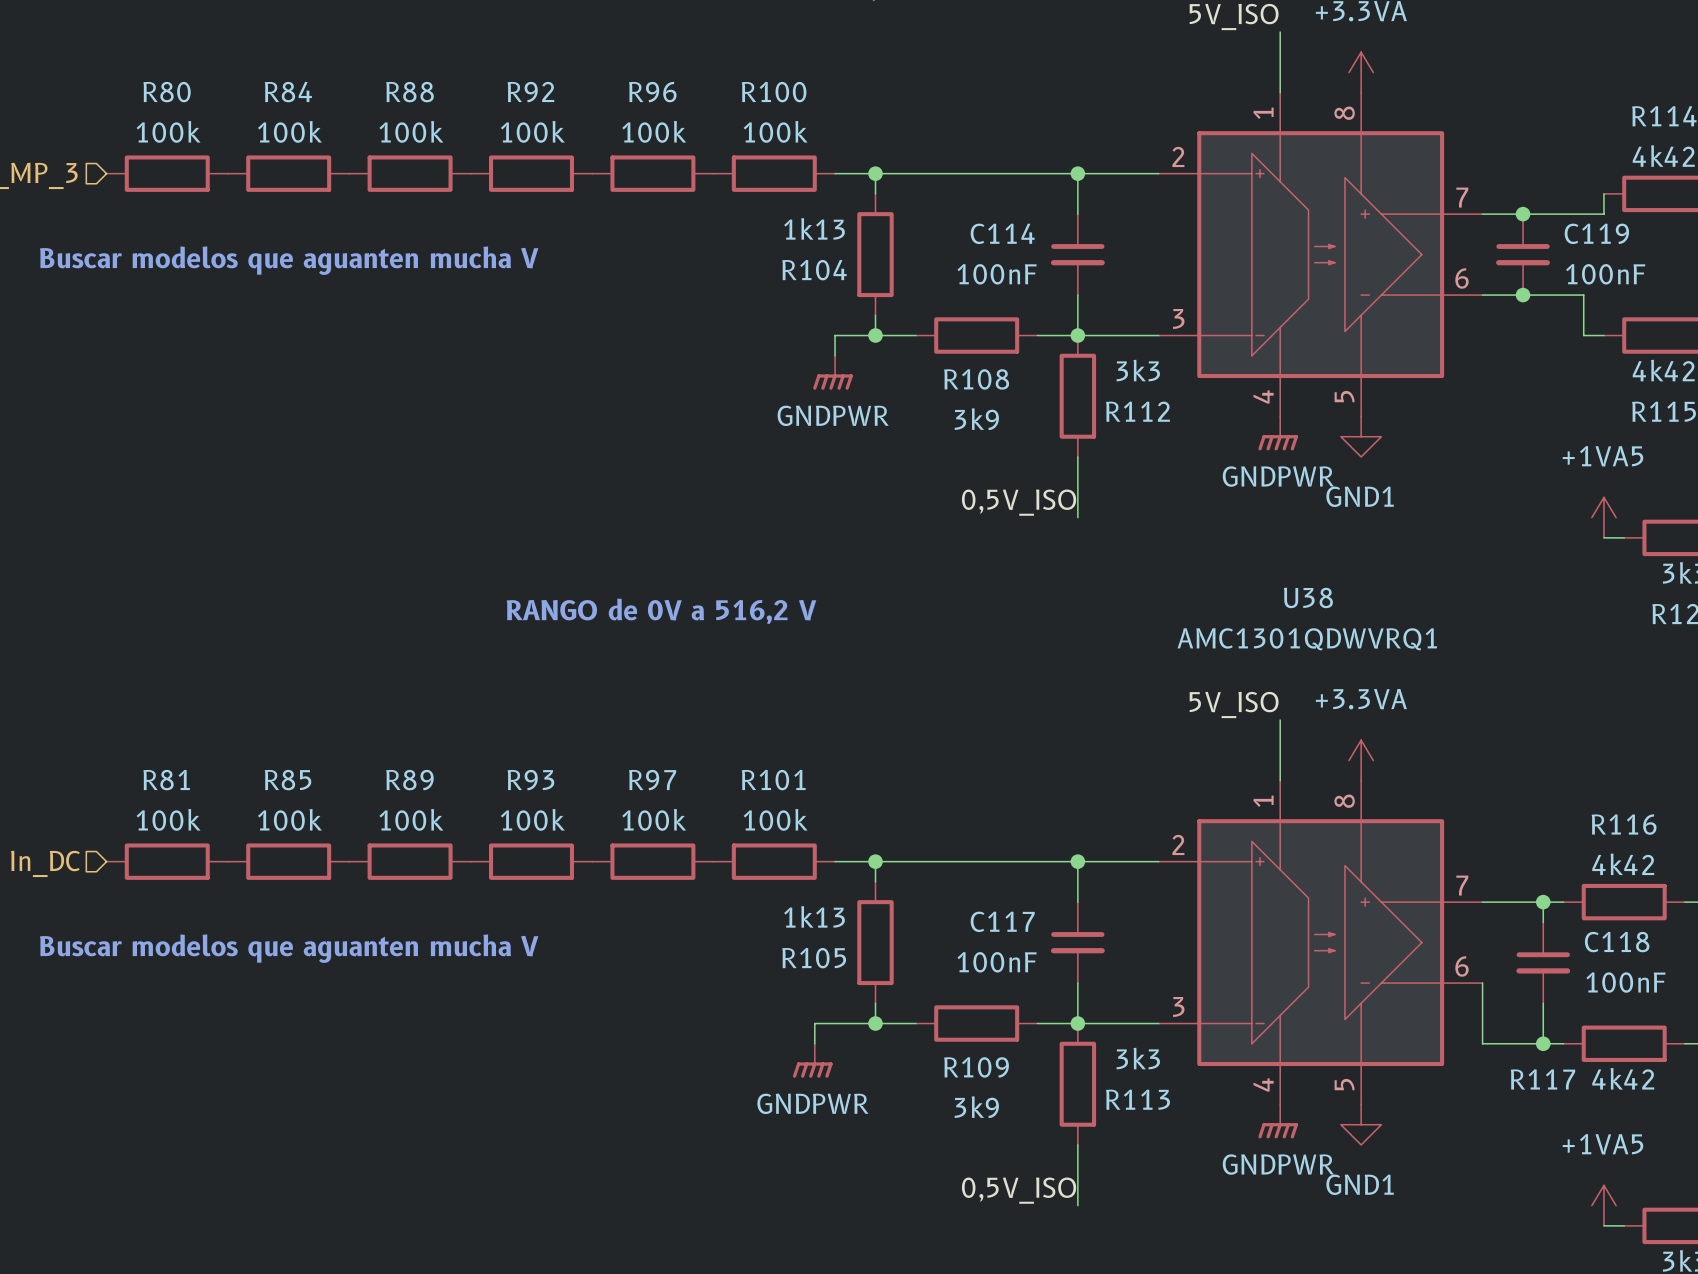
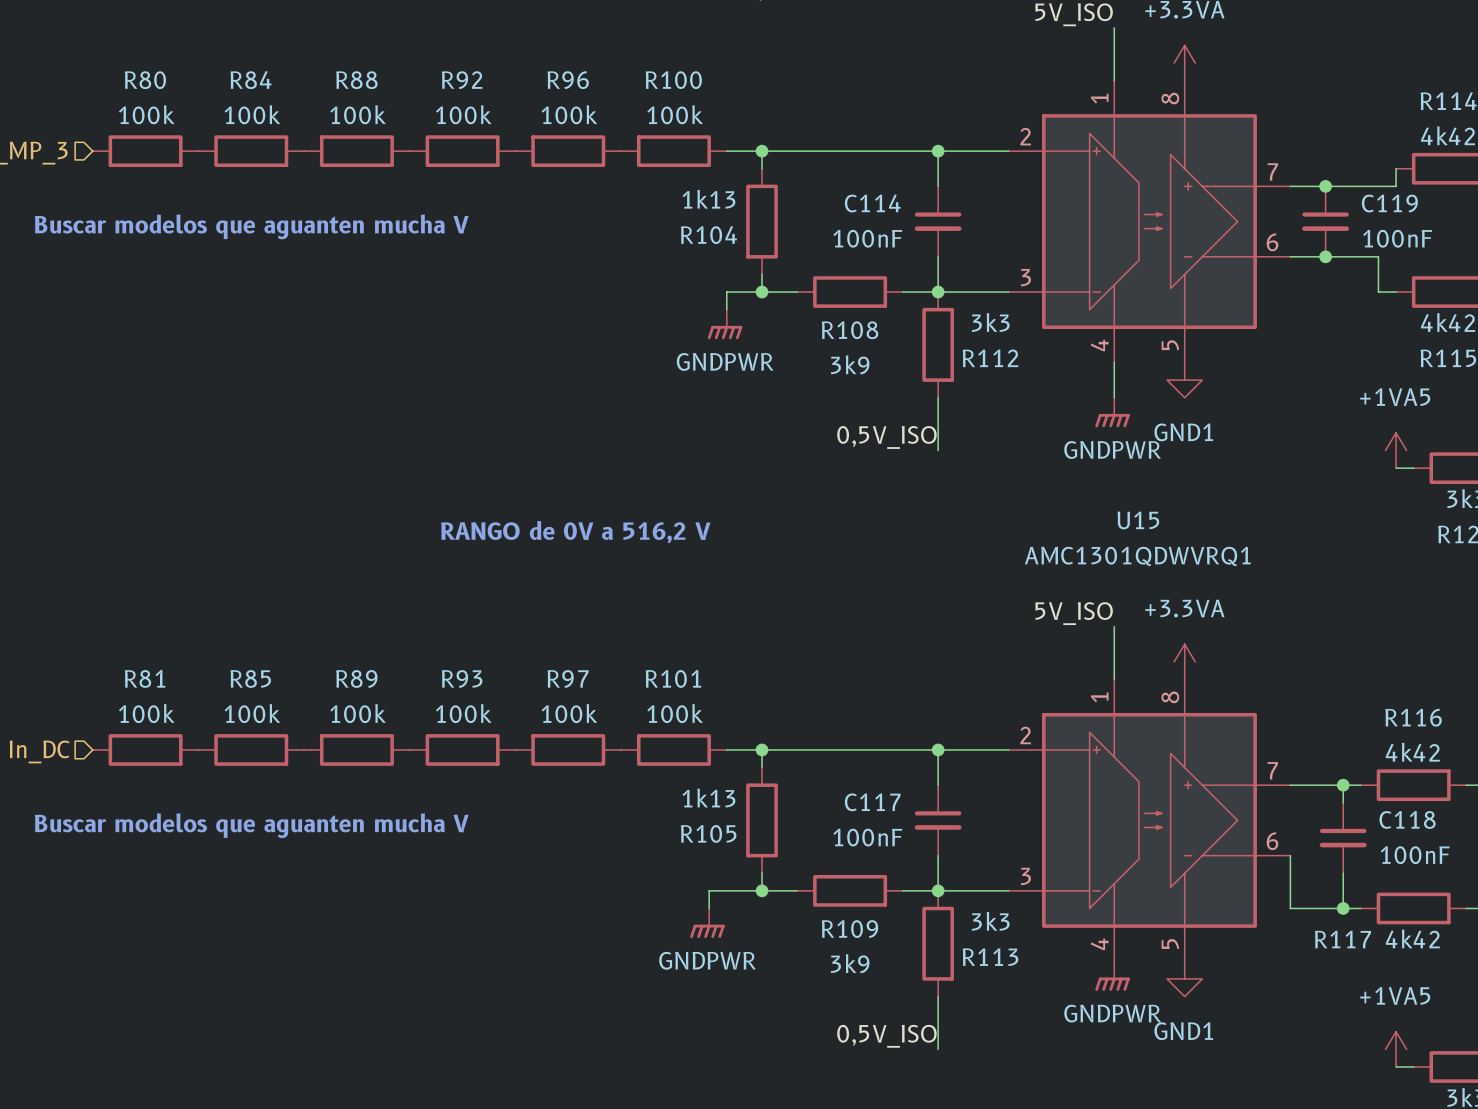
power symbol position: GNDPWR (1278, 433) -> GNDPWR (1112, 412)
U38 name: U38 (1308, 597) -> U15 (1138, 520)

